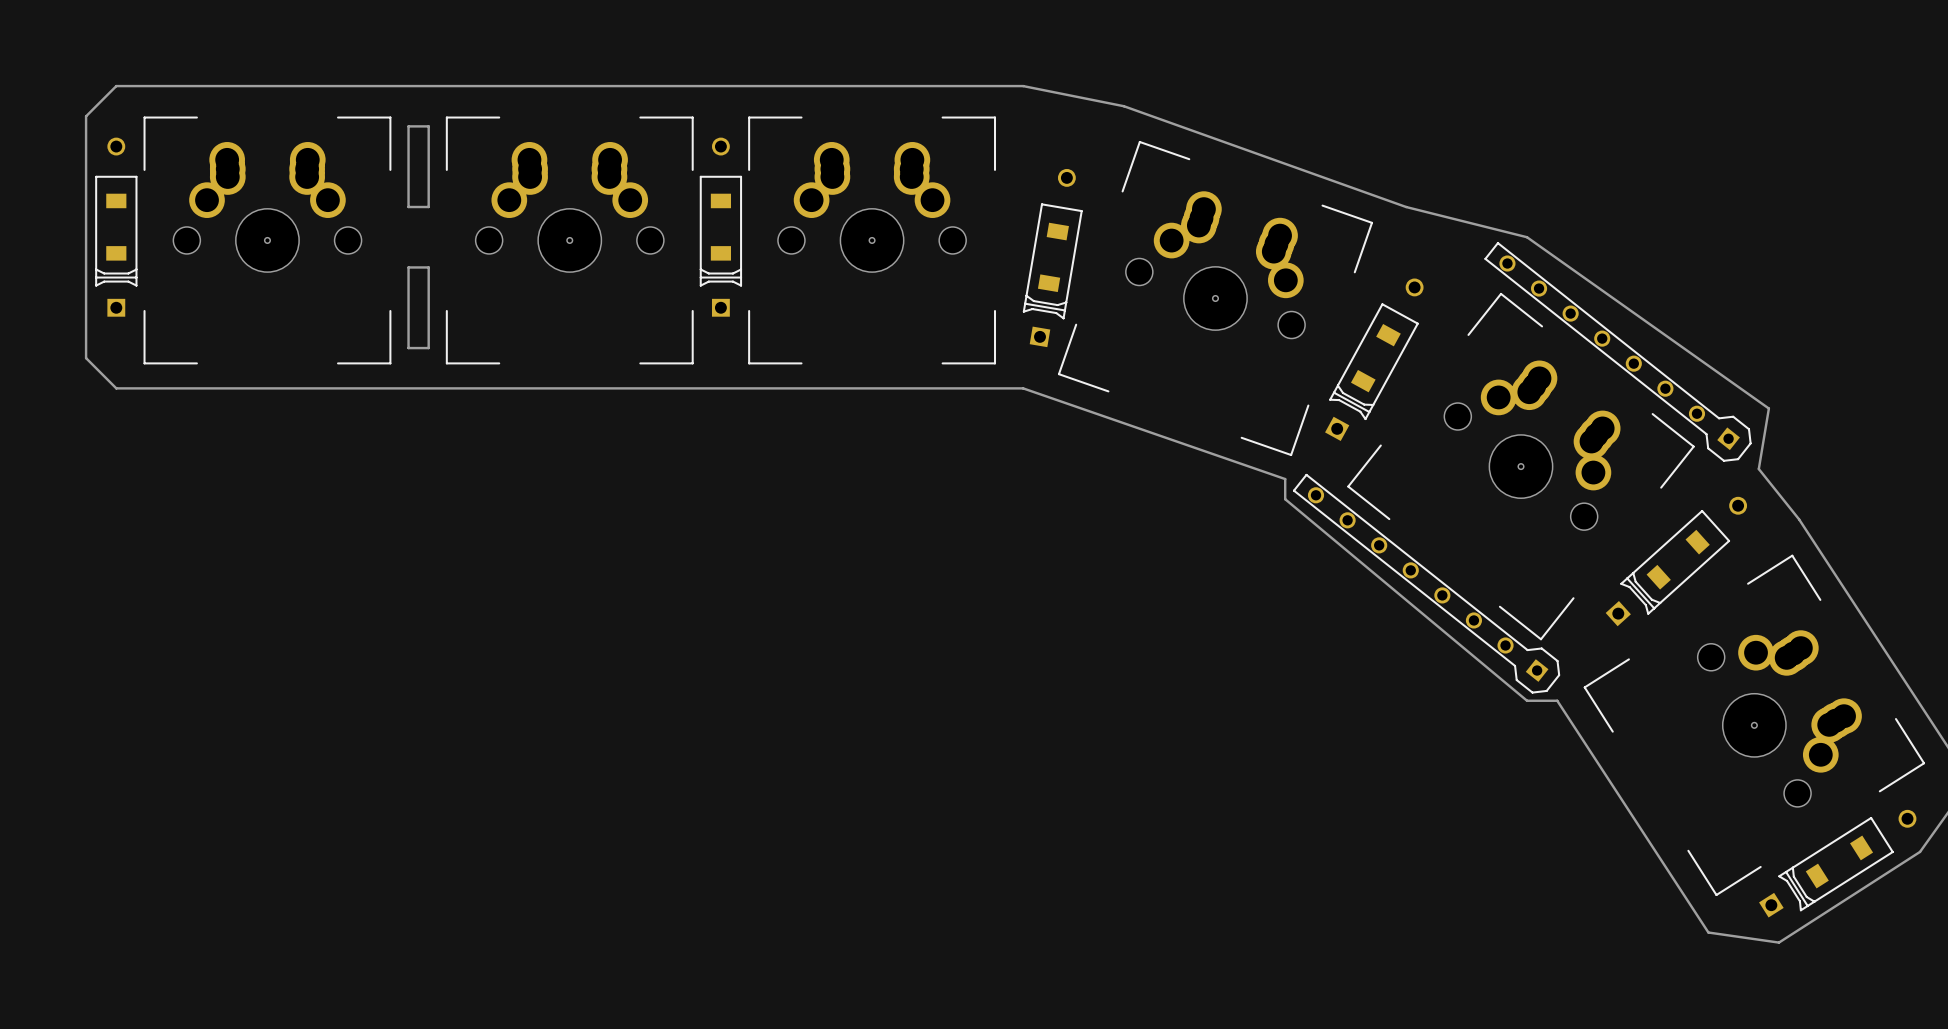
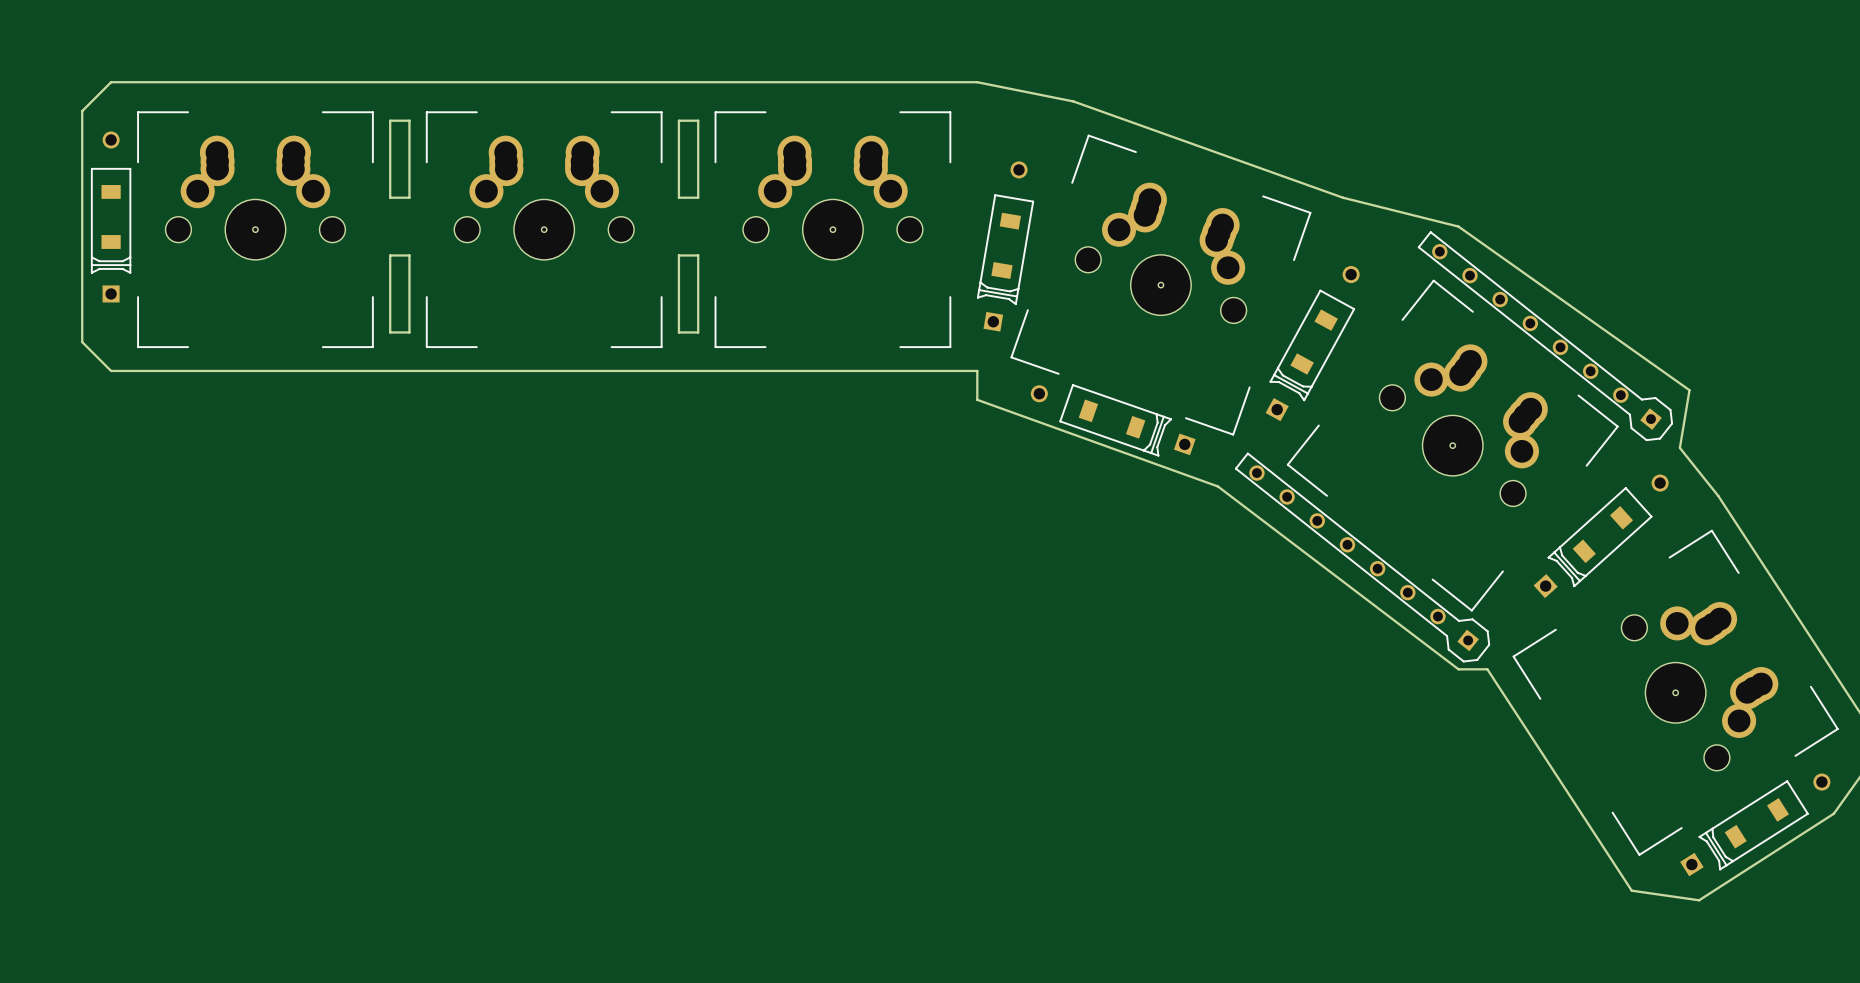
board edge: none -> (698, 120) (698, 197) (678, 197) (678, 120) (698, 120)
part: (720, 227) -> none
board edge: none -> (698, 255) (678, 255) (678, 332) (698, 332) (698, 255)
board edge: (1023, 388) (1285, 479) (1285, 499) (1527, 700) -> (977, 370) (977, 399) (1217, 486) (1458, 669)
part: none -> (1113, 420)

